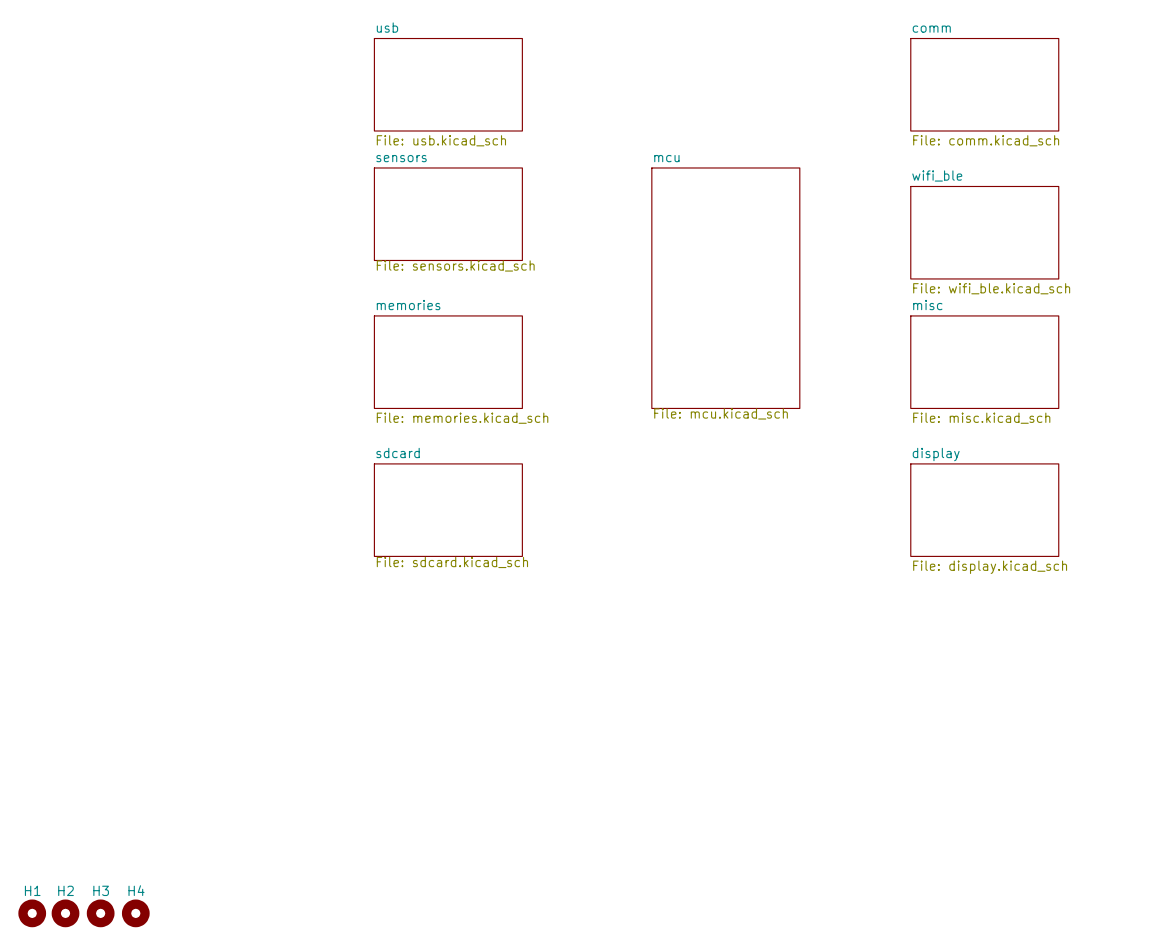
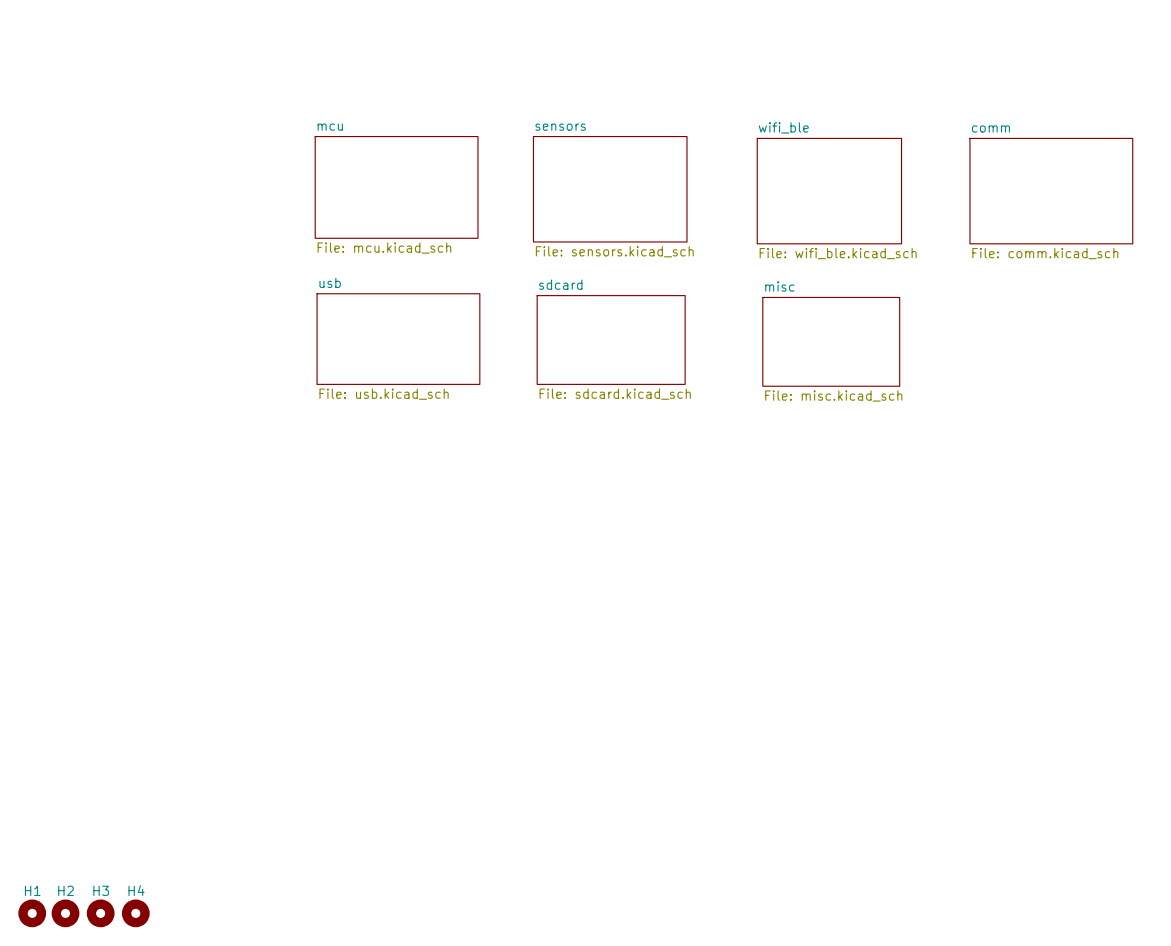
sheet usb: File: usb.kicad_sch (448, 84) -> none
sheet comm: File: comm.kicad_sch (984, 84) -> none
sheet mcu: none -> File: mcu.kicad_sch (396, 187)
sheet sensors: none -> File: sensors.kicad_sch (610, 189)
sheet wifi_ble: none -> File: wifi_ble.kicad_sch (829, 191)
sheet comm: none -> File: comm.kicad_sch (1051, 191)
sheet sensors: File: sensors.kicad_sch (448, 214) -> none
sheet wifi_ble: File: wifi_ble.kicad_sch (984, 232) -> none
sheet mcu: File: mcu.kicad_sch (725, 288) -> none
sheet usb: none -> File: usb.kicad_sch (398, 339)
sheet sdcard: none -> File: sdcard.kicad_sch (611, 340)
sheet misc: none -> File: misc.kicad_sch (831, 341)
sheet memories: File: memories.kicad_sch (448, 362) -> none
sheet misc: File: misc.kicad_sch (984, 362) -> none
sheet sdcard: File: sdcard.kicad_sch (448, 510) -> none
sheet display: File: display.kicad_sch (984, 510) -> none

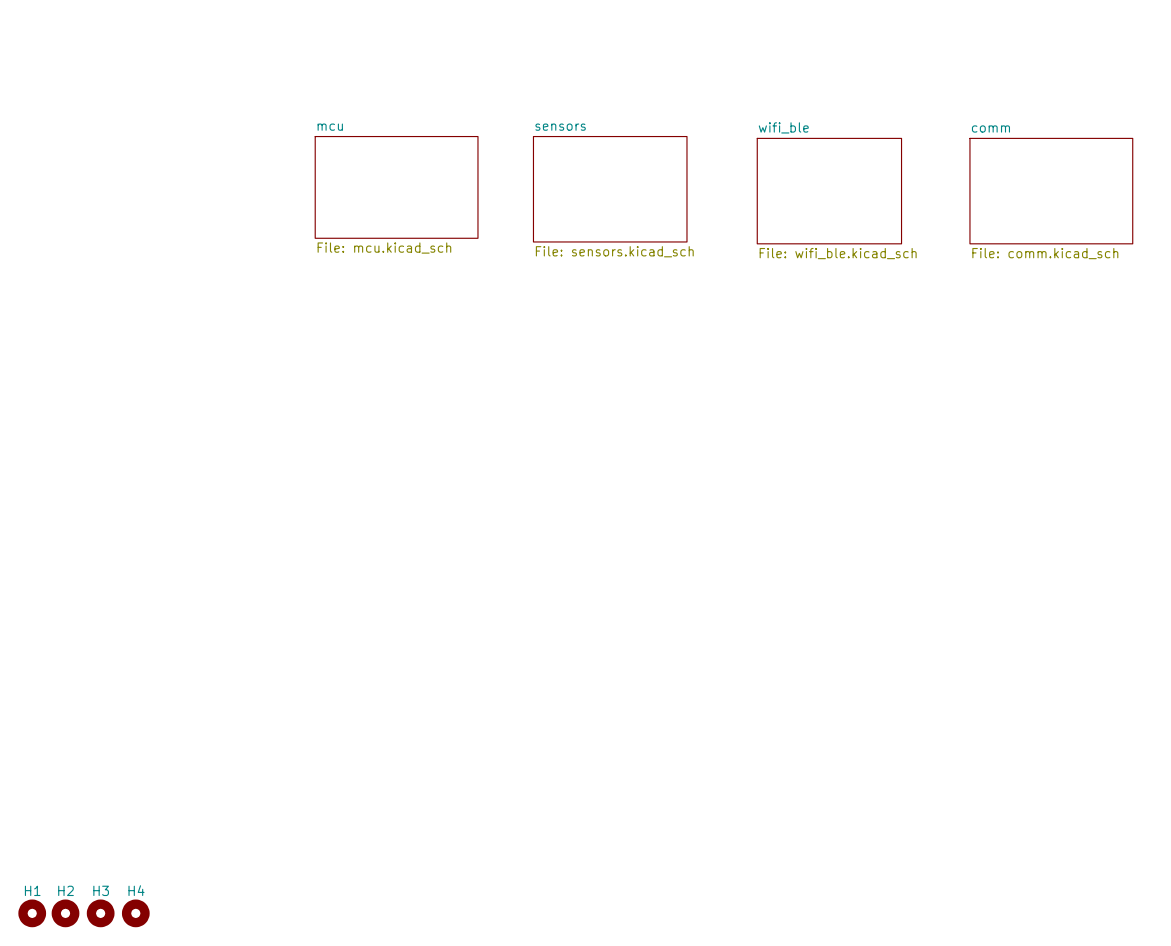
sheet usb: File: usb.kicad_sch (398, 339) -> none
sheet sdcard: File: sdcard.kicad_sch (611, 340) -> none
sheet misc: File: misc.kicad_sch (831, 341) -> none

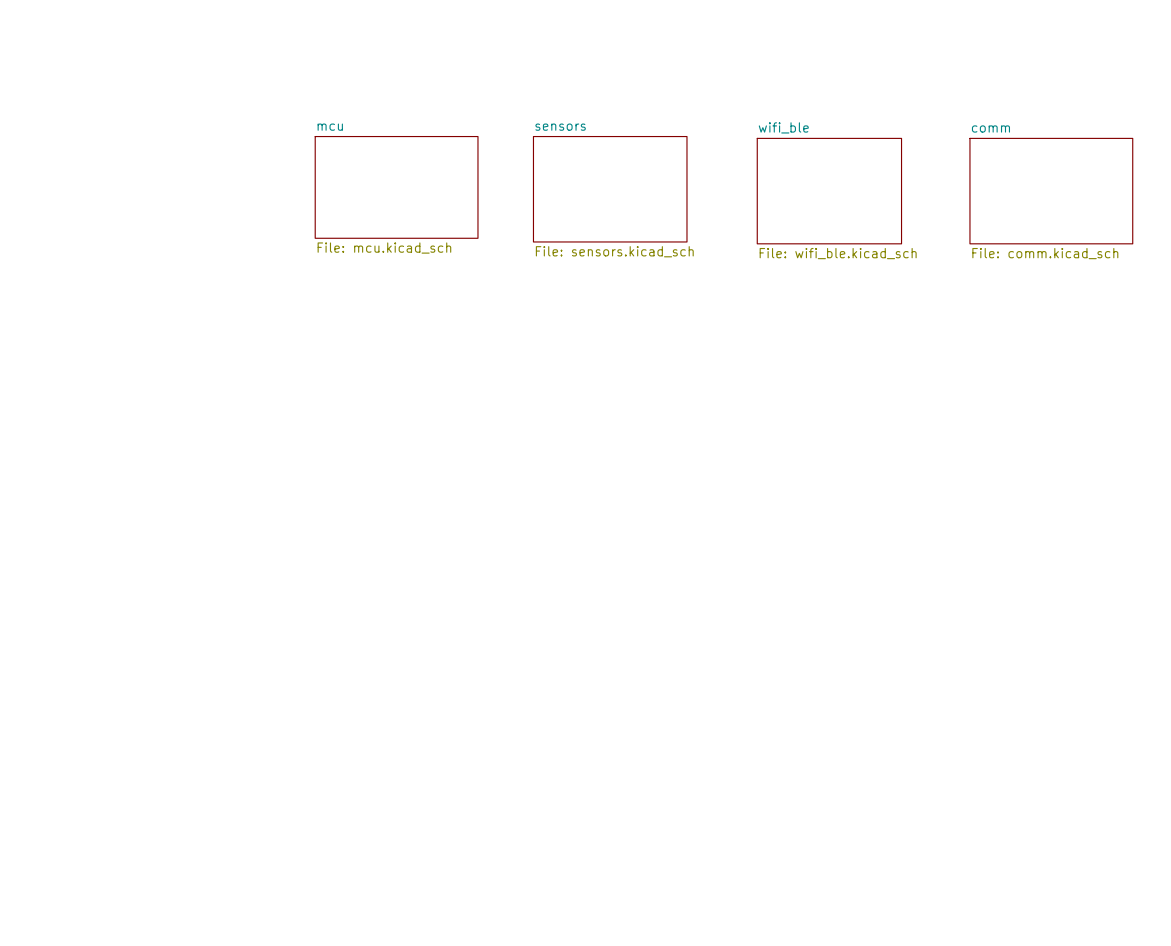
H1: (32, 913) -> none
H2: (65, 913) -> none
H3: (100, 913) -> none
H4: (135, 913) -> none

